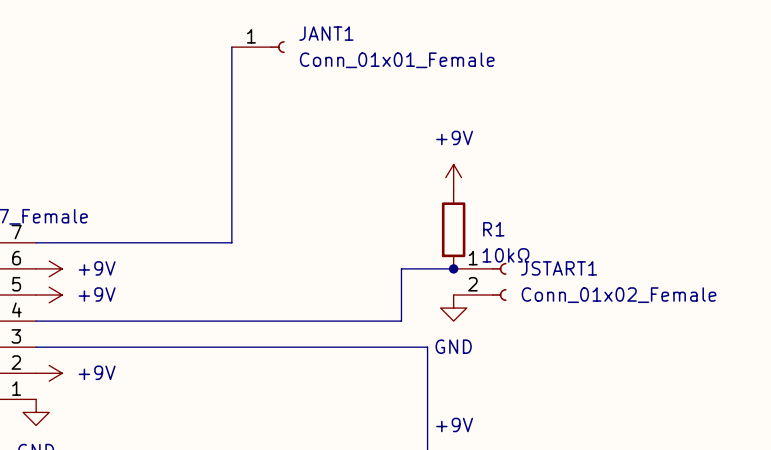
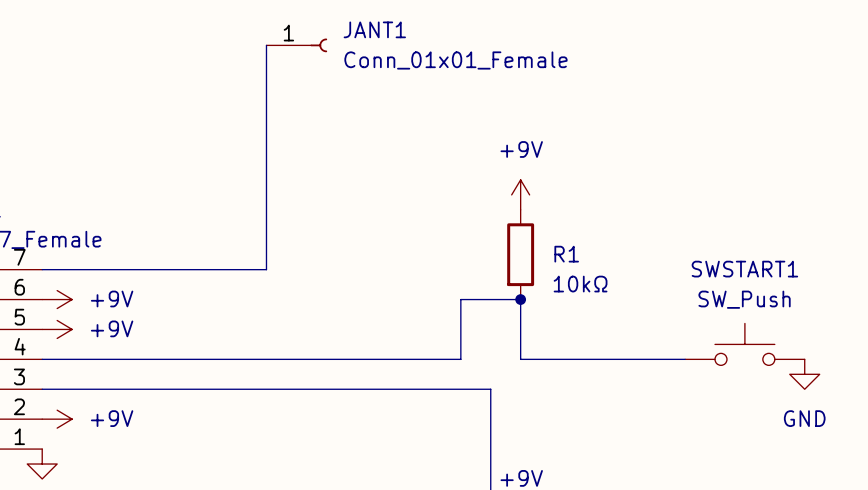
wire: none -> (520, 299) (520, 359) (685, 359)
JSTART1: Conn_01x02_Female (480, 281) -> none
power symbol position: GND (453, 308) -> GND (804, 374)
SWSTART1: none -> SW_Push (744, 344)

